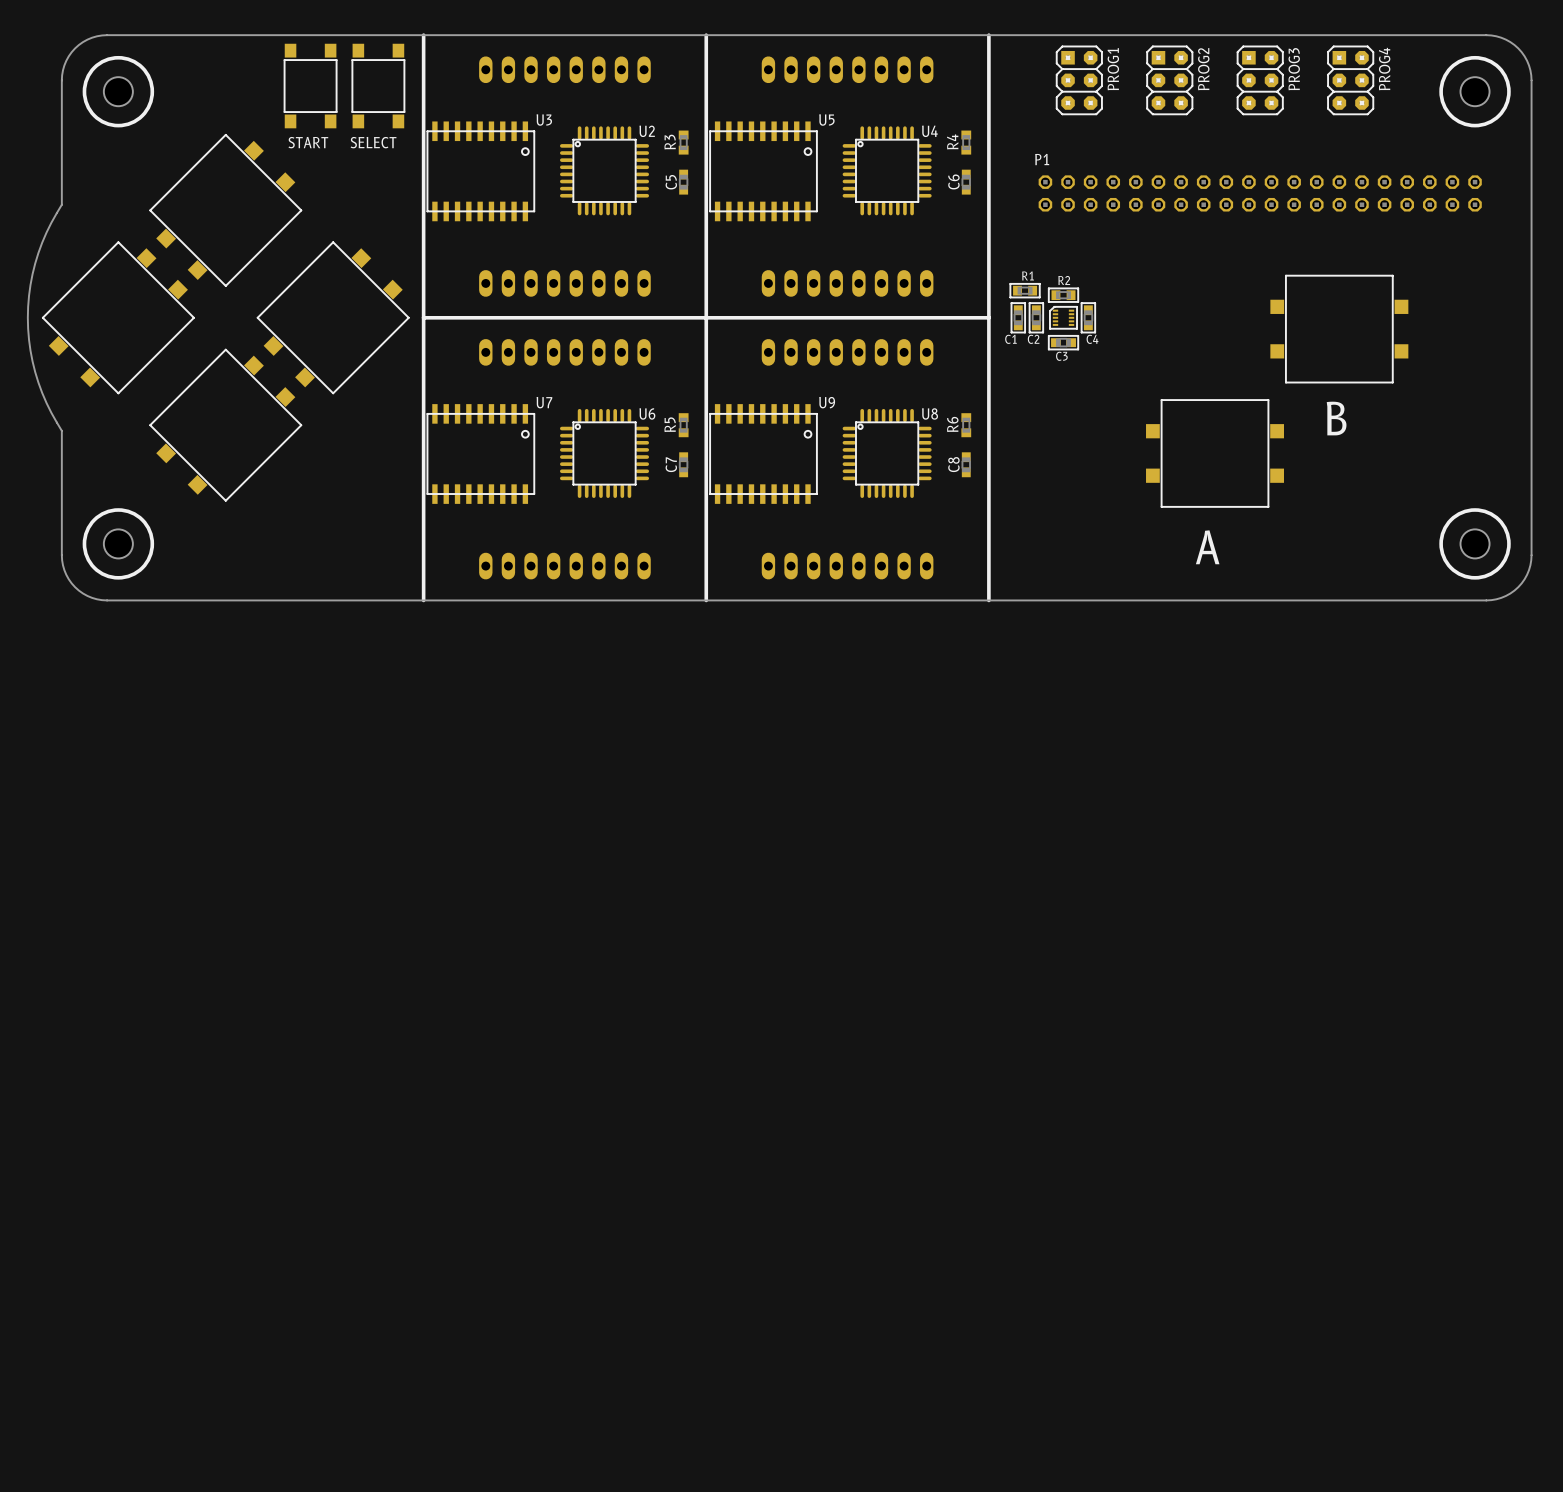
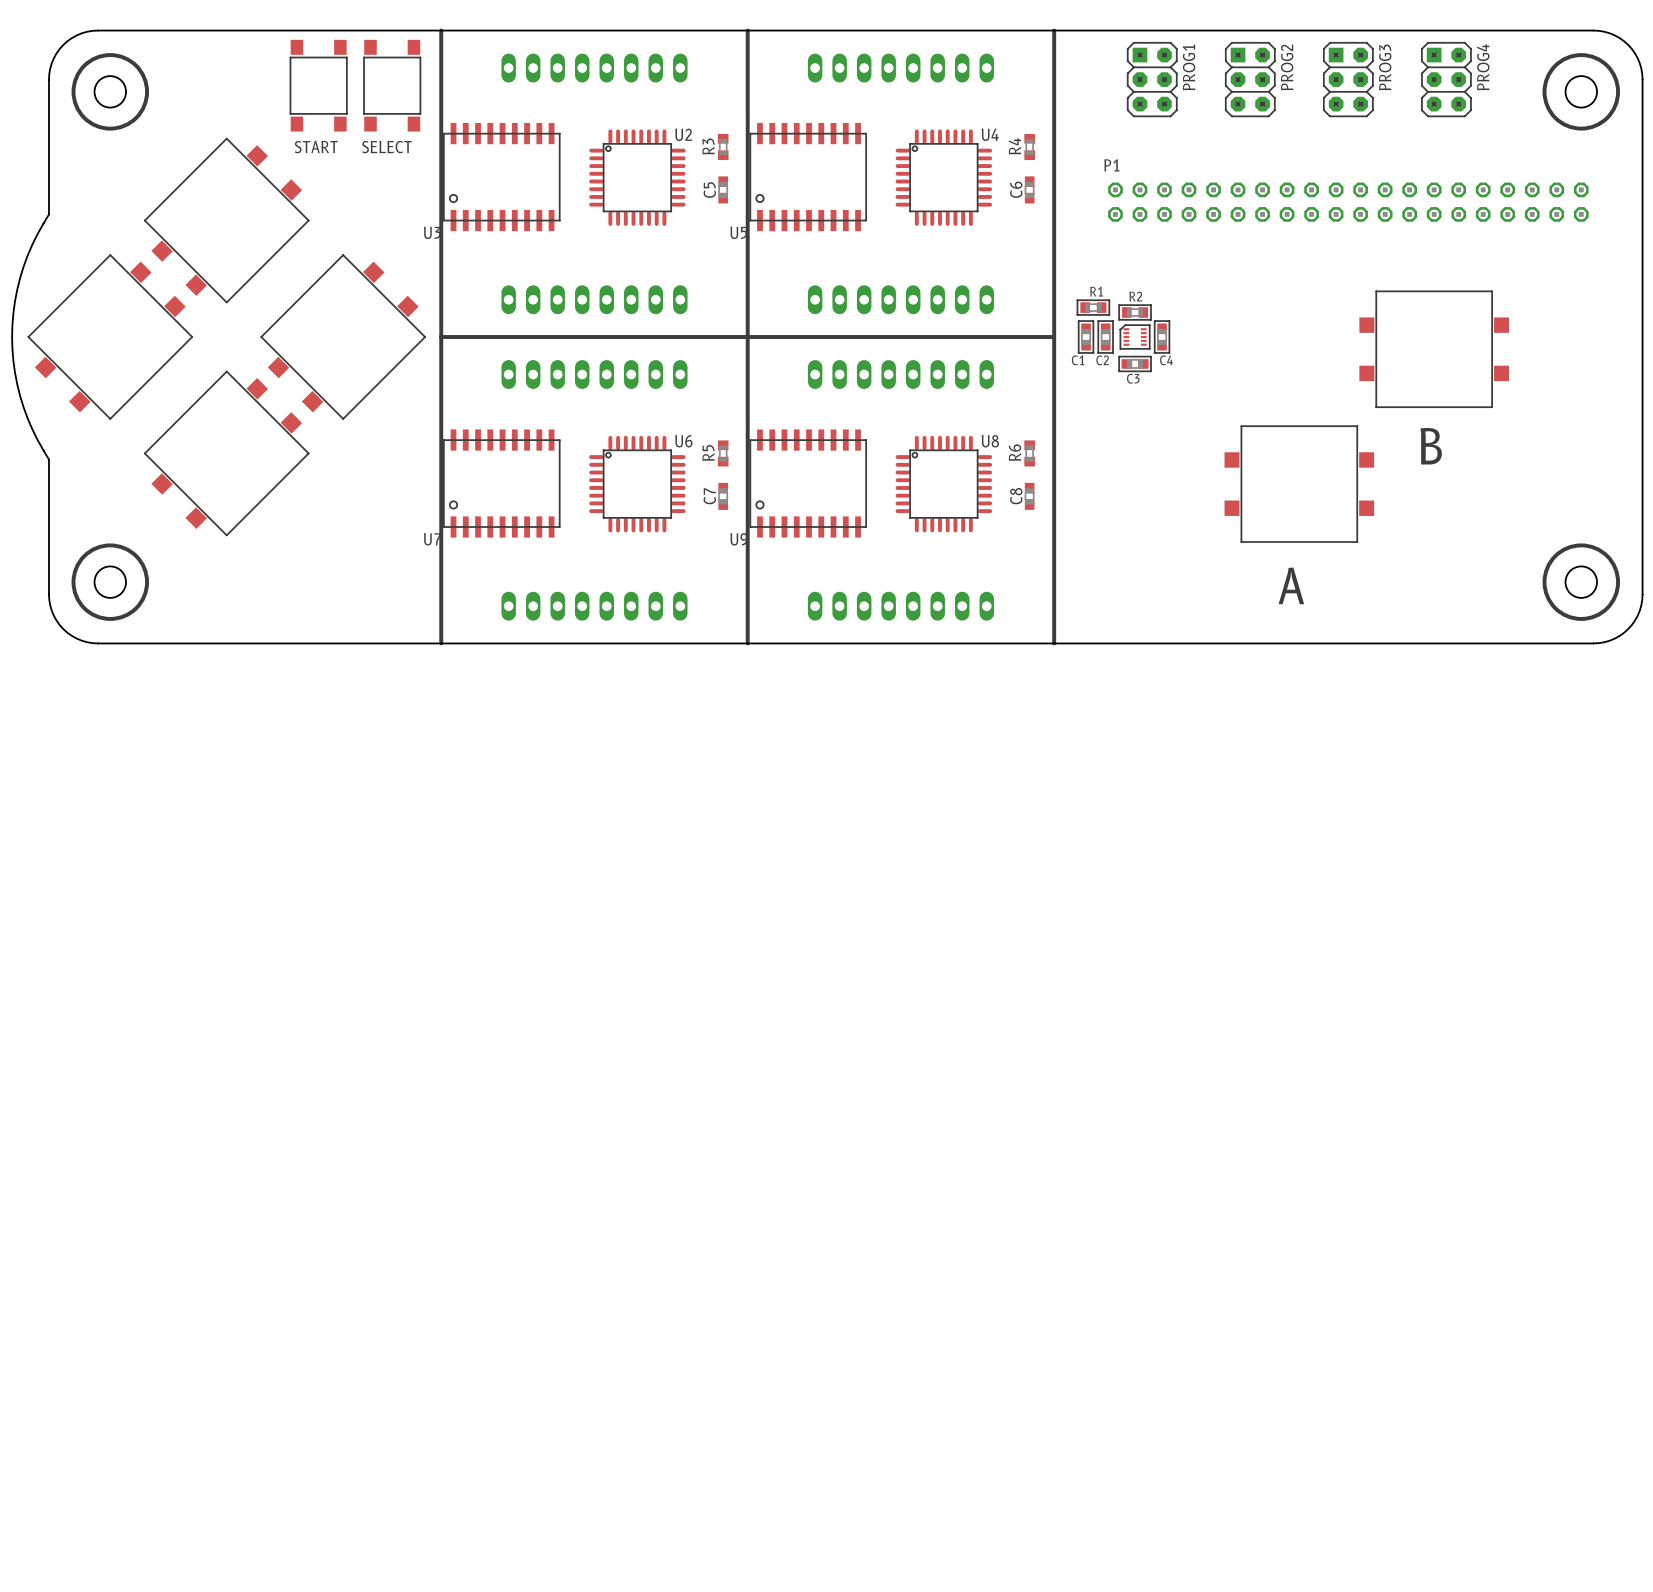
U3 rotation: 0° (480, 171) -> 180° (501, 177)
U5 rotation: 0° (763, 171) -> 180° (808, 177)
U7 rotation: 0° (480, 454) -> 180° (501, 483)
U9 rotation: 0° (763, 454) -> 180° (808, 483)

